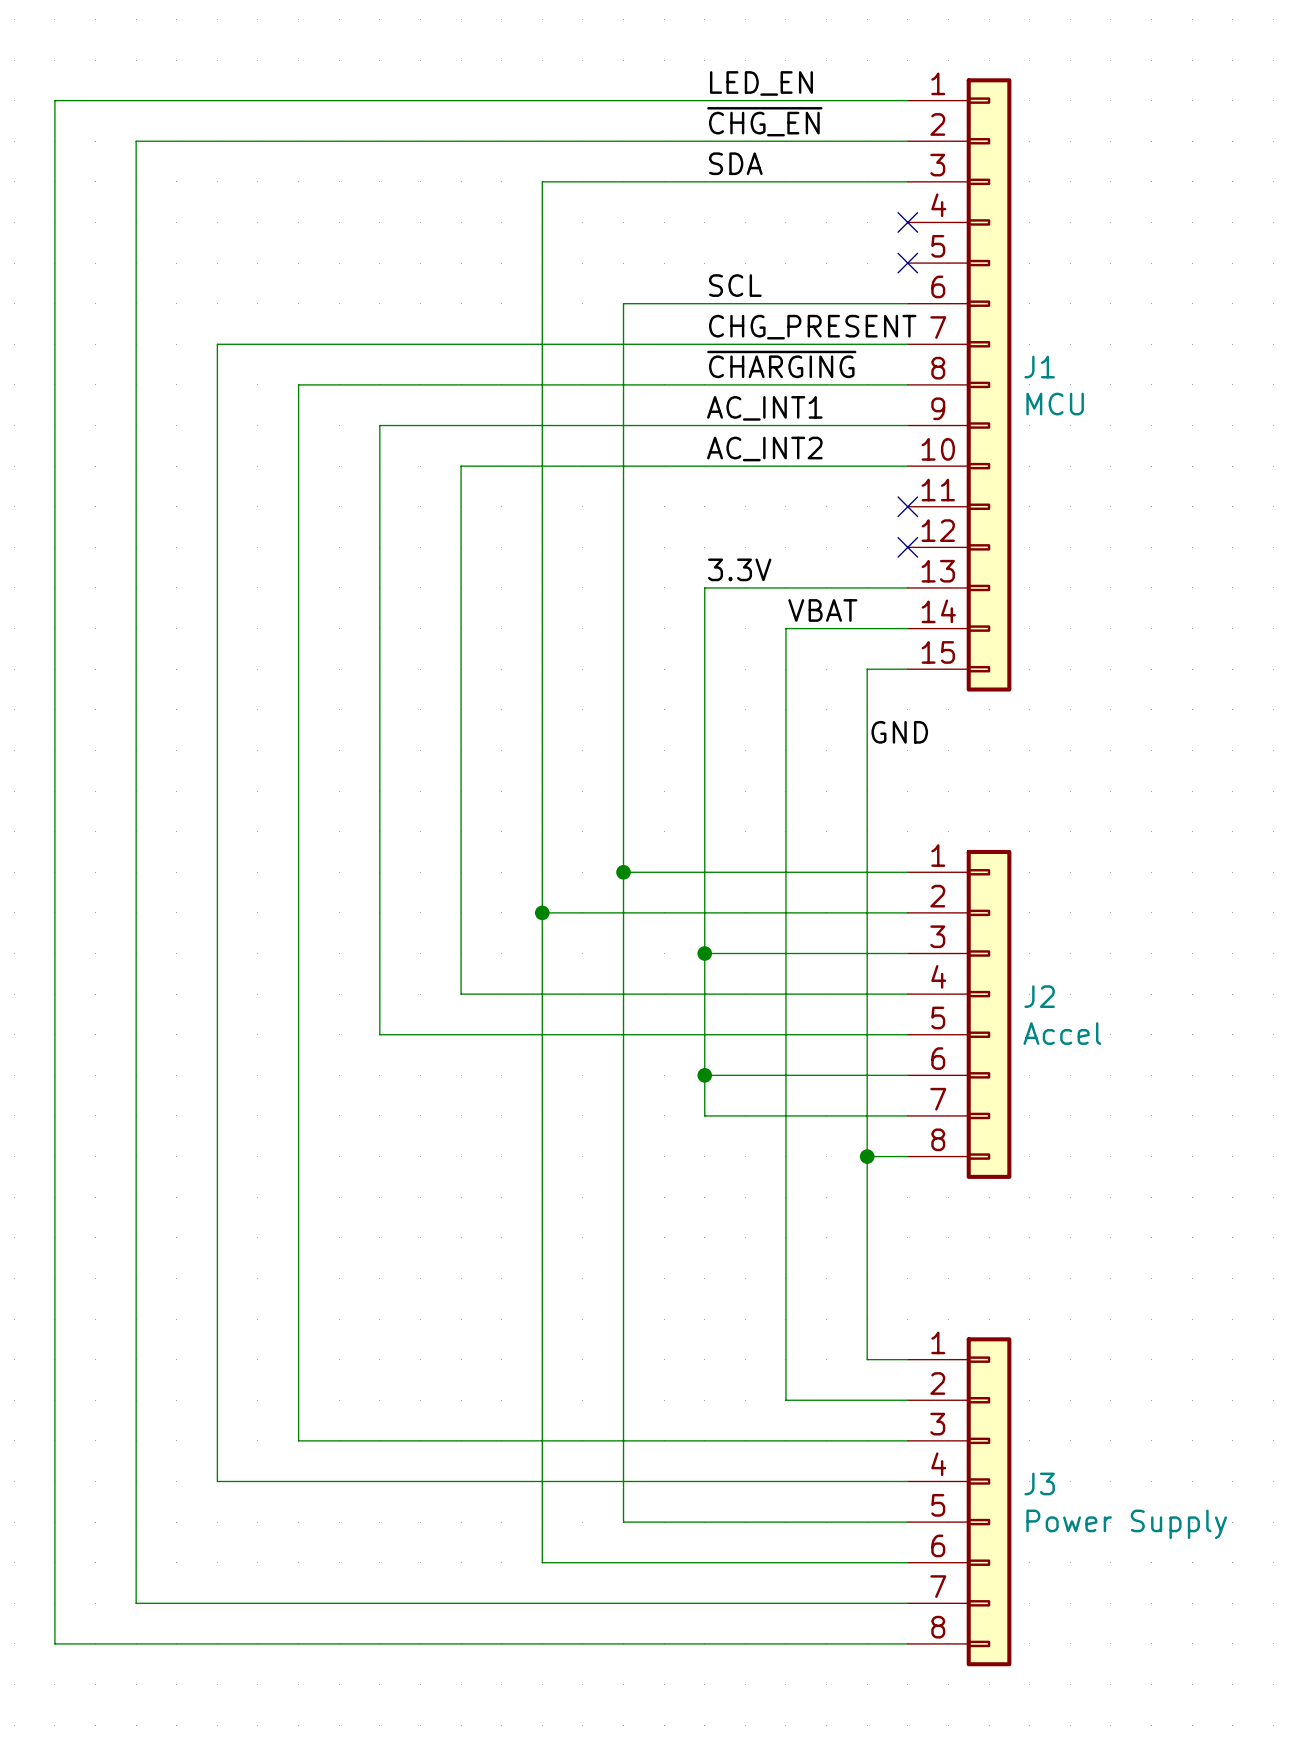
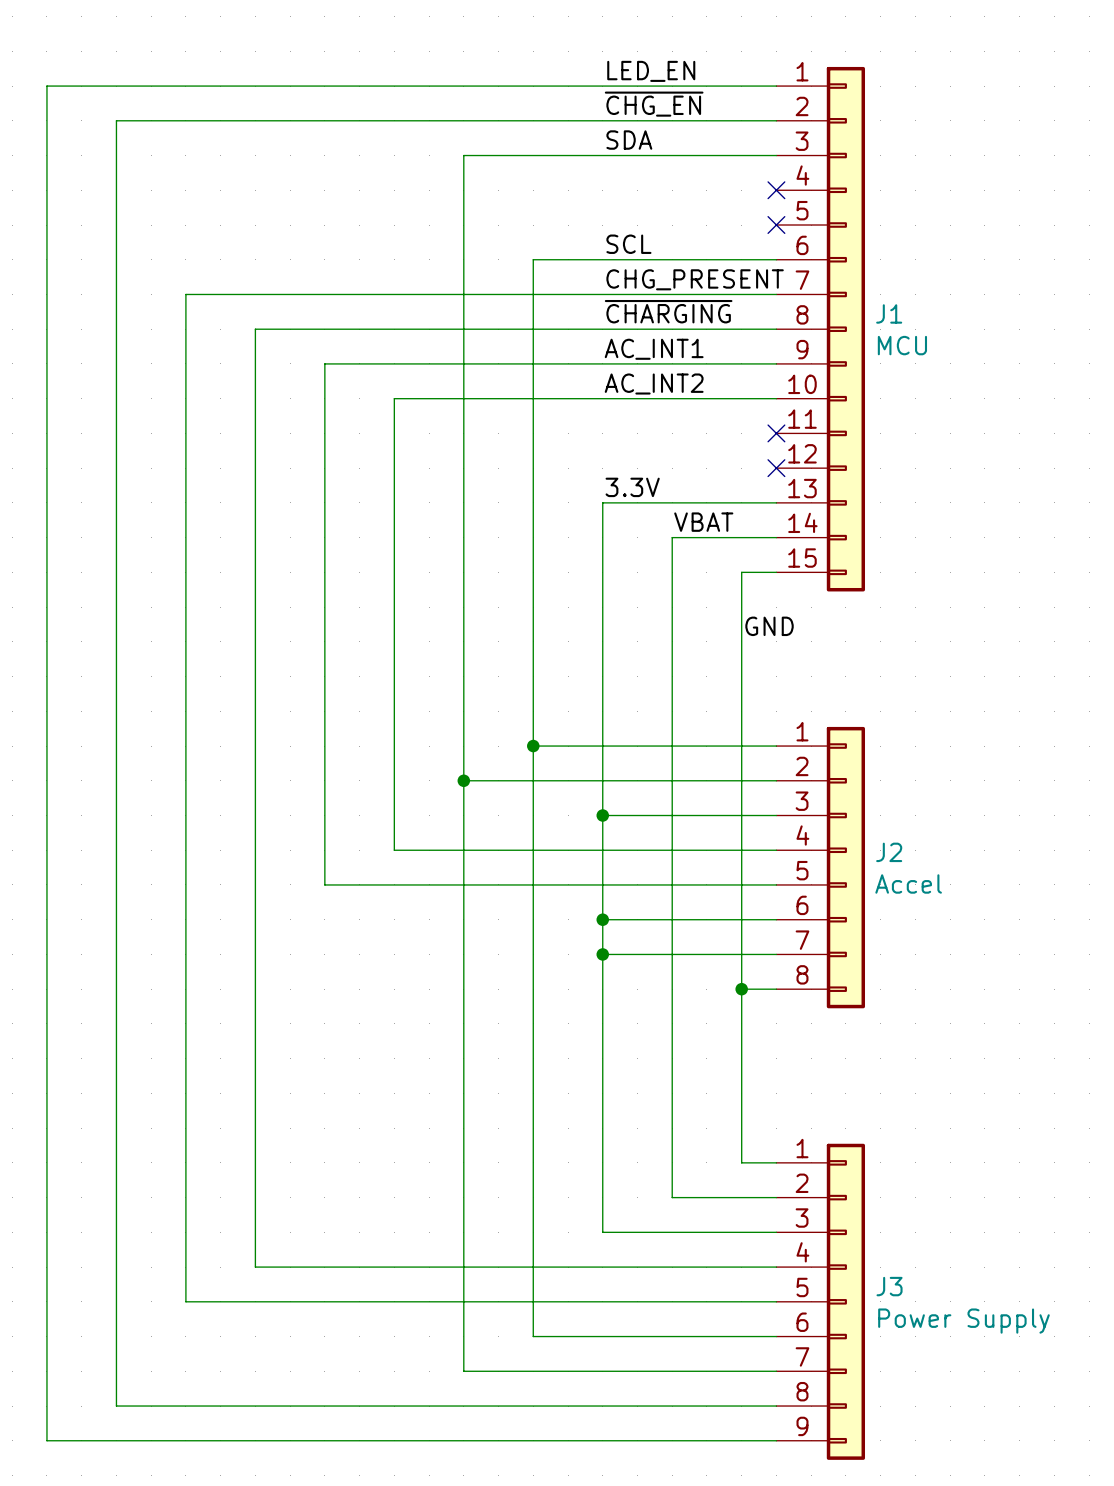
junction: none -> (602, 954)
J3 symbol: [907, 1337, 1012, 1667] -> [776, 1143, 866, 1460]
wire: (298, 1440) (704, 1440) -> (602, 954) (602, 1232)
wire: (217, 1481) (298, 1481) -> (255, 1232) (255, 1267)
wire: none -> (185, 1267) (185, 1301) (533, 1301) (533, 1336)
wire: (542, 1562) (623, 1562) -> (463, 1336) (463, 1371)
wire: (136, 1603) (542, 1603) -> none
wire: (54, 1643) (136, 1643) -> (116, 1371) (116, 1406)
wire: none -> (46, 1406) (46, 1440) (776, 1440)

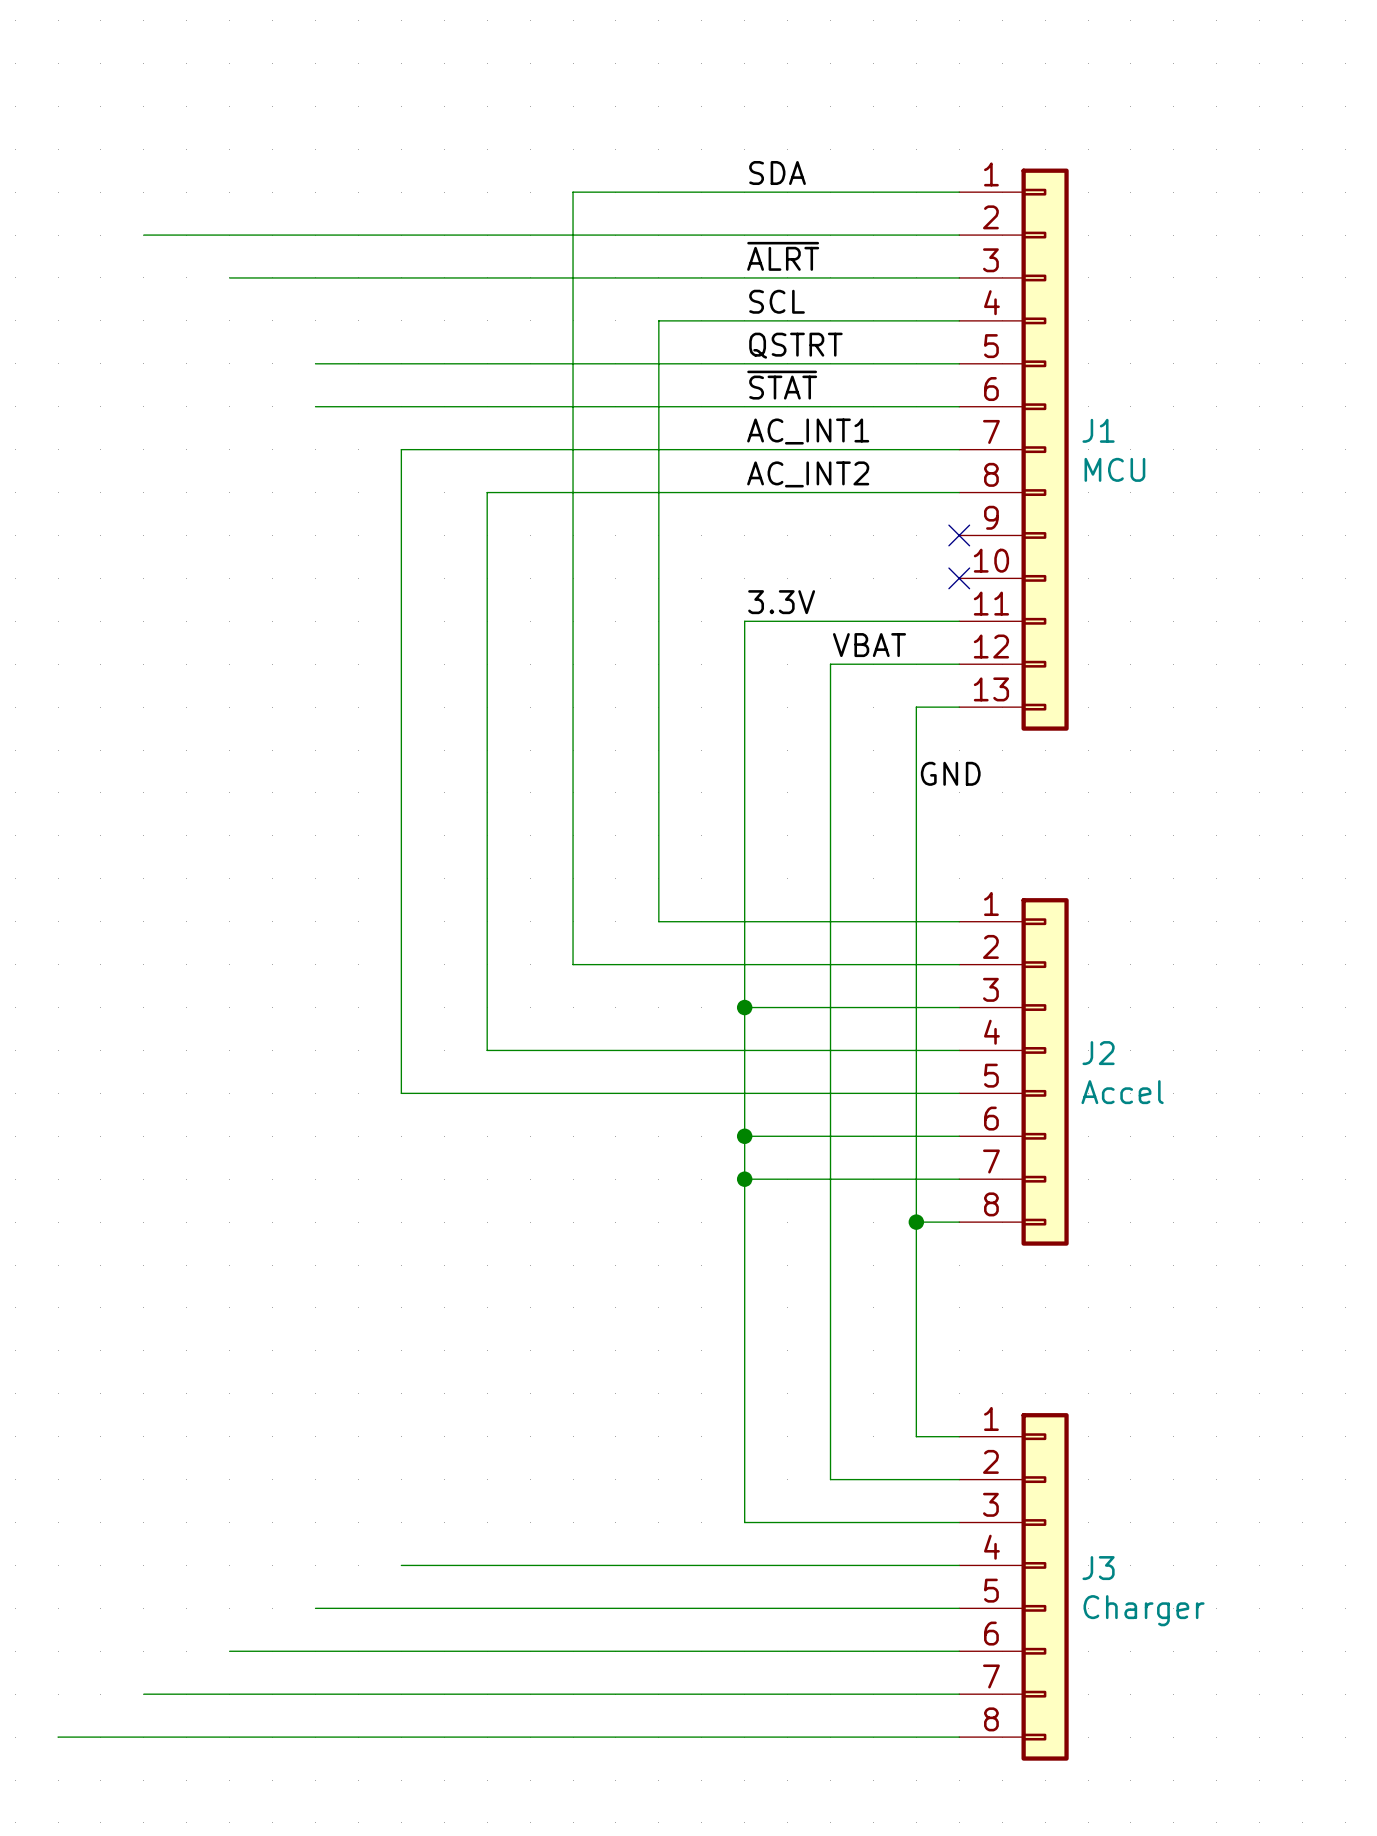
J1 symbol: [776, 66, 866, 592] -> [959, 168, 1069, 731]
label: LED_EN (651, 71) -> none
wire: (776, 86) (46, 86) (46, 1440) (776, 1440) -> none
label: ~{CHG_EN} (654, 104) -> none
wire: (776, 120) (116, 120) (116, 1406) -> (58, 1737) (143, 1737)
wire: none -> (143, 235) (959, 235)
no-connect mark: (776, 190) -> none
label: none -> ~{ALRT} (783, 256)
wire: none -> (229, 277) (959, 277)
no-connect mark: (776, 225) -> none
label: CHG_PRESENT (695, 279) -> QSTRT (795, 345)
wire: (255, 294) (185, 294) (185, 1301) (255, 1301) -> none
label: ~{CHARGING} (668, 311) -> ~{STAT} (782, 385)
wire: (255, 329) (255, 1267) (324, 1267) -> none
wire: (533, 746) (533, 1336) -> (229, 1651) (658, 1651)
junction: (533, 746) -> none
wire: (463, 780) (463, 1371) -> (143, 1694) (573, 1694)
junction: (463, 780) -> none
J3 symbol: [776, 1143, 866, 1460] -> [959, 1413, 1069, 1761]
J3 value: Power Supply (963, 1321) -> Charger (1144, 1610)

